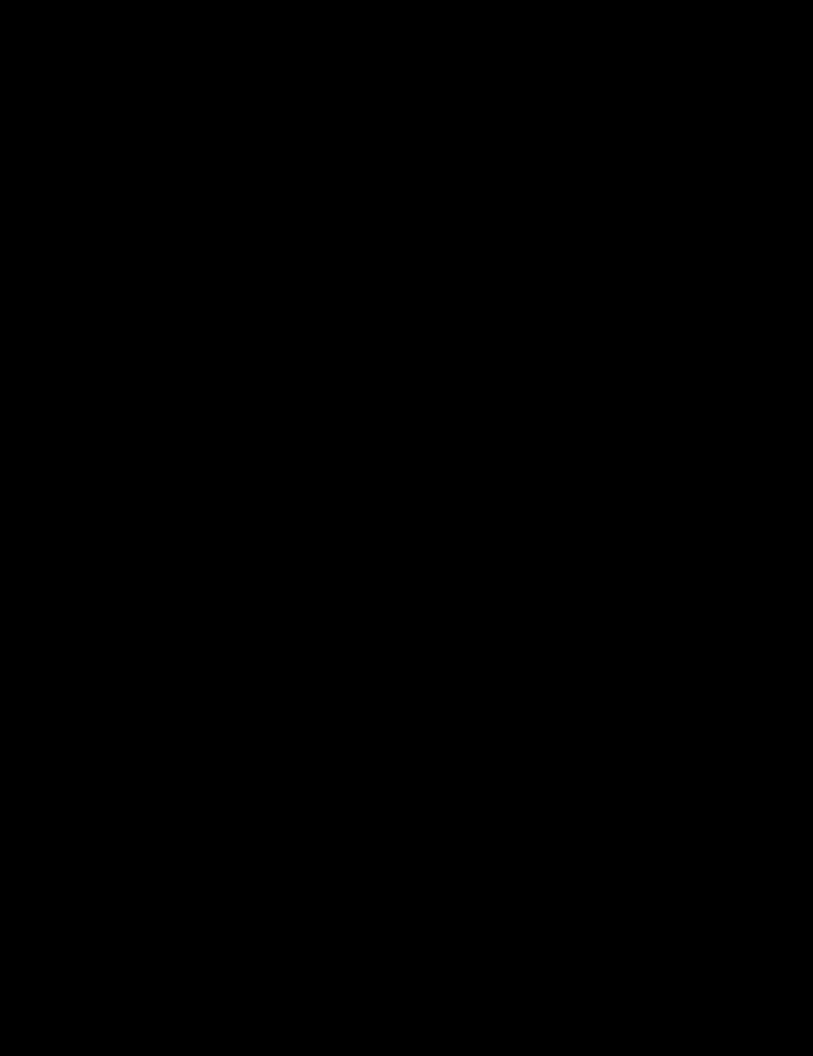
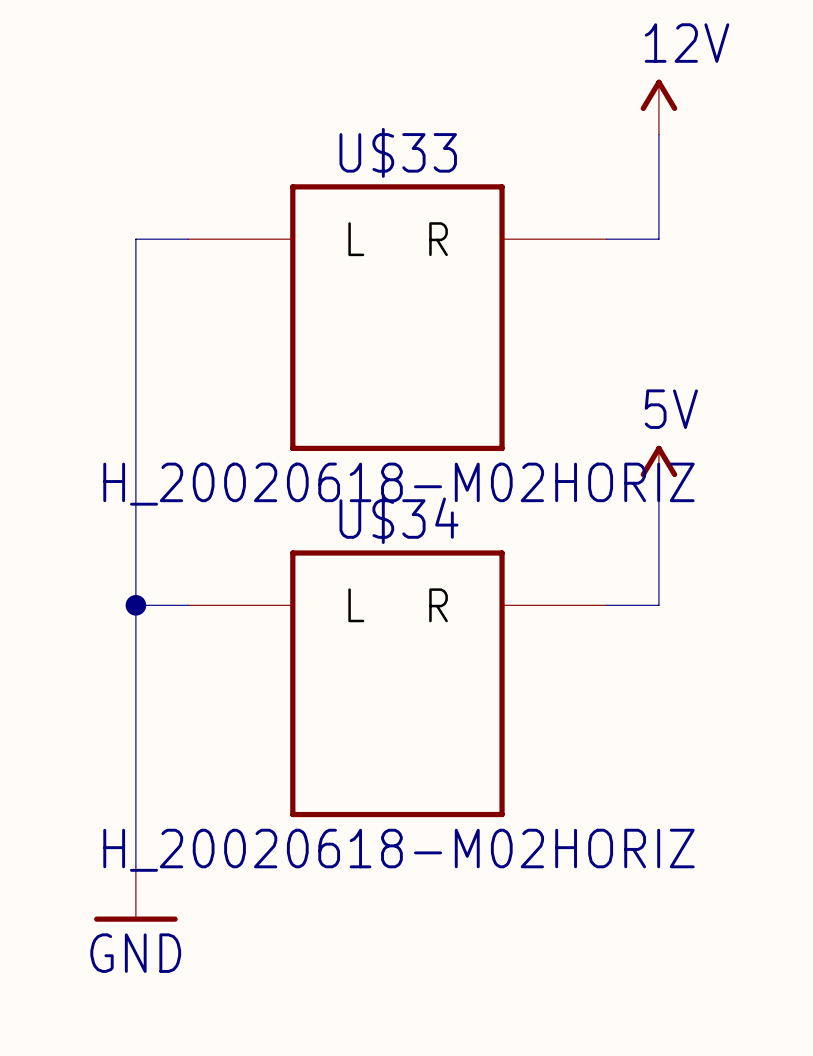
power symbol: none -> 12V (658, 107)
wire: none -> (658, 134) (658, 239) (606, 239)
wire: none -> (188, 239) (135, 239) (135, 866)
U$33: none -> H_20020618-M02HORIZ (397, 317)
power symbol: none -> 5V (658, 473)
wire: none -> (658, 500) (658, 605) (606, 605)
wire: none -> (135, 605) (188, 605)
junction: none -> (135, 605)
U$34: none -> H_20020618-M02HORIZ (397, 683)
power symbol: none -> GND (135, 894)

